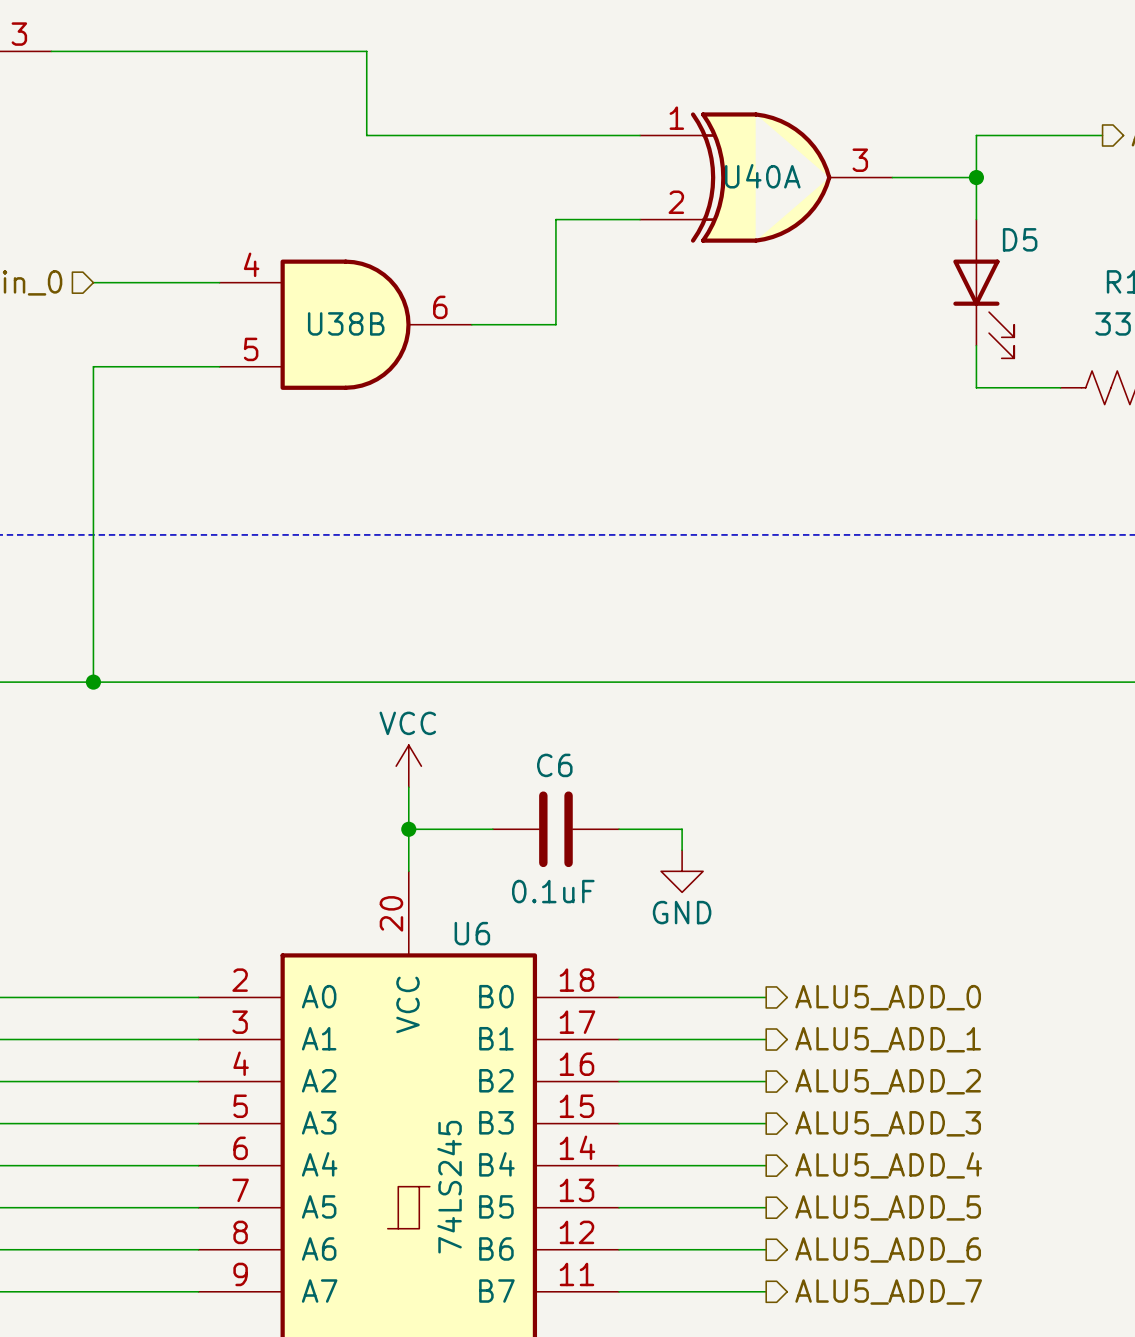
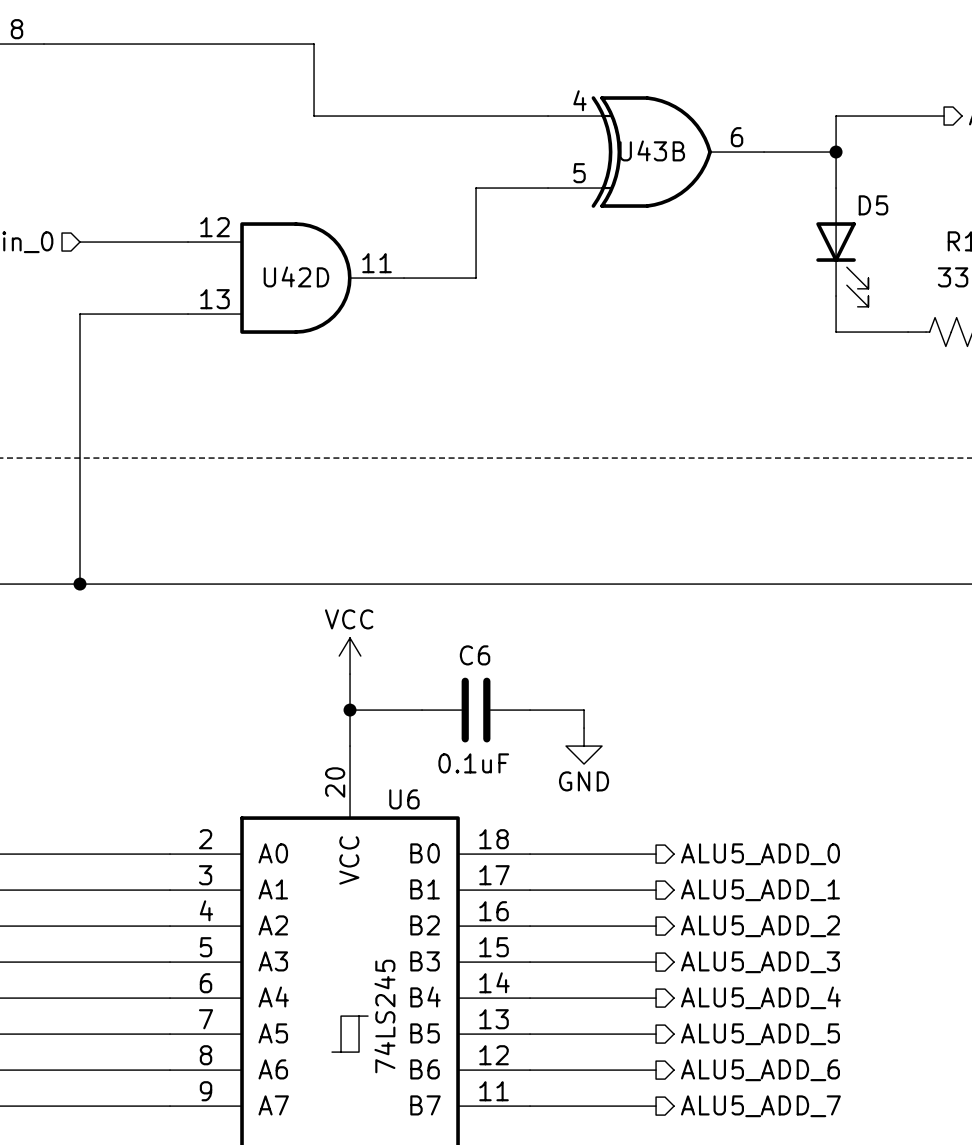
part pin number: 3 (19, 34) -> 8 (17, 29)
U40A pin number: 1 (676, 118) -> 4 (579, 100)
U40A pin number: 3 (860, 160) -> 6 (737, 137)
U40A name: U40A (762, 176) -> U43B (652, 150)
U40A pin number: 2 (676, 202) -> 5 (579, 173)
U38B pin number: 4 (251, 264) -> 12 (215, 227)
U38B pin number: 6 (440, 307) -> 11 (377, 263)
U38B name: U38B (346, 323) -> U42D (296, 276)
U38B pin number: 5 (251, 349) -> 13 (215, 299)

